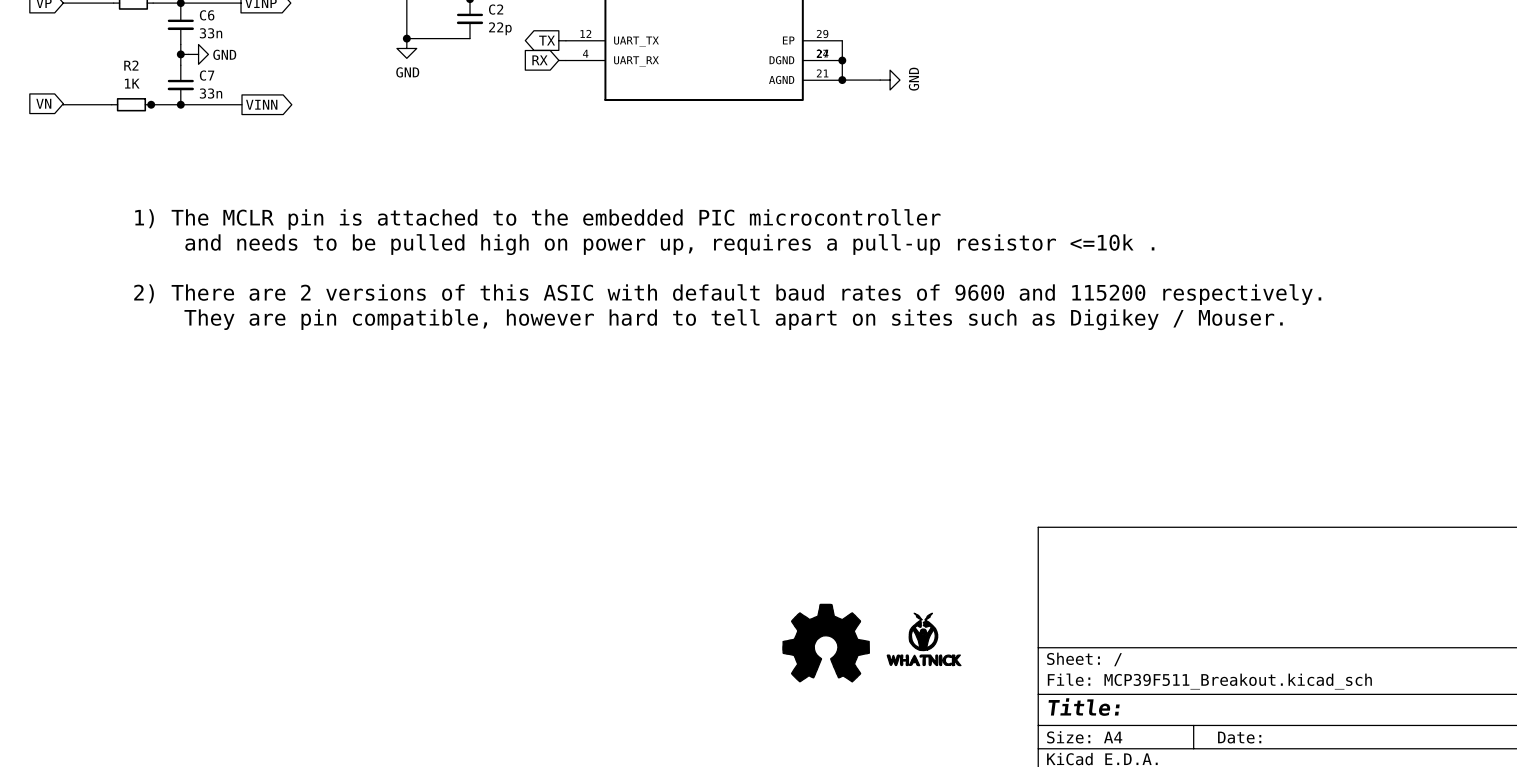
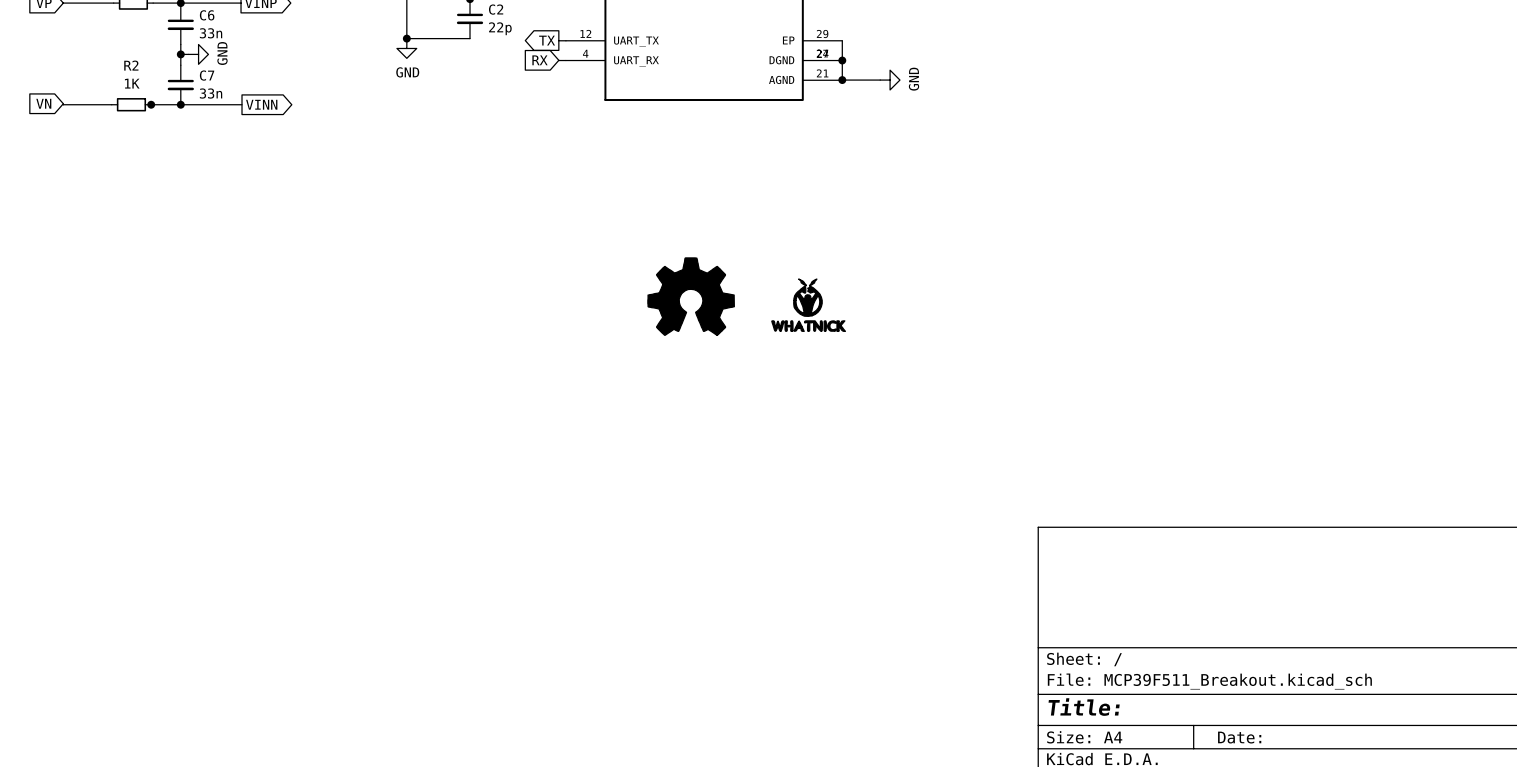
power symbol text rotation: 0° (224, 54) -> 90° counterclockwise (222, 53)
text: 1) The MCLR pin is attached to the embedded PIC microcontroller (537, 219) -> none
text: and needs to be pulled high on power up, requires a pull-up resistor <=10k . (669, 244) -> none
text: 2) There are 2 versions of this ASIC with default baud rates of 9600 and 115200 respectively. (727, 294) -> none
part: none -> (691, 296)
part: none -> (808, 305)
text: They are pin compatible, however hard to tell apart on sites such as Digikey / Mouser. (733, 319) -> none
part: (924, 639) -> none
part: (826, 643) -> none

